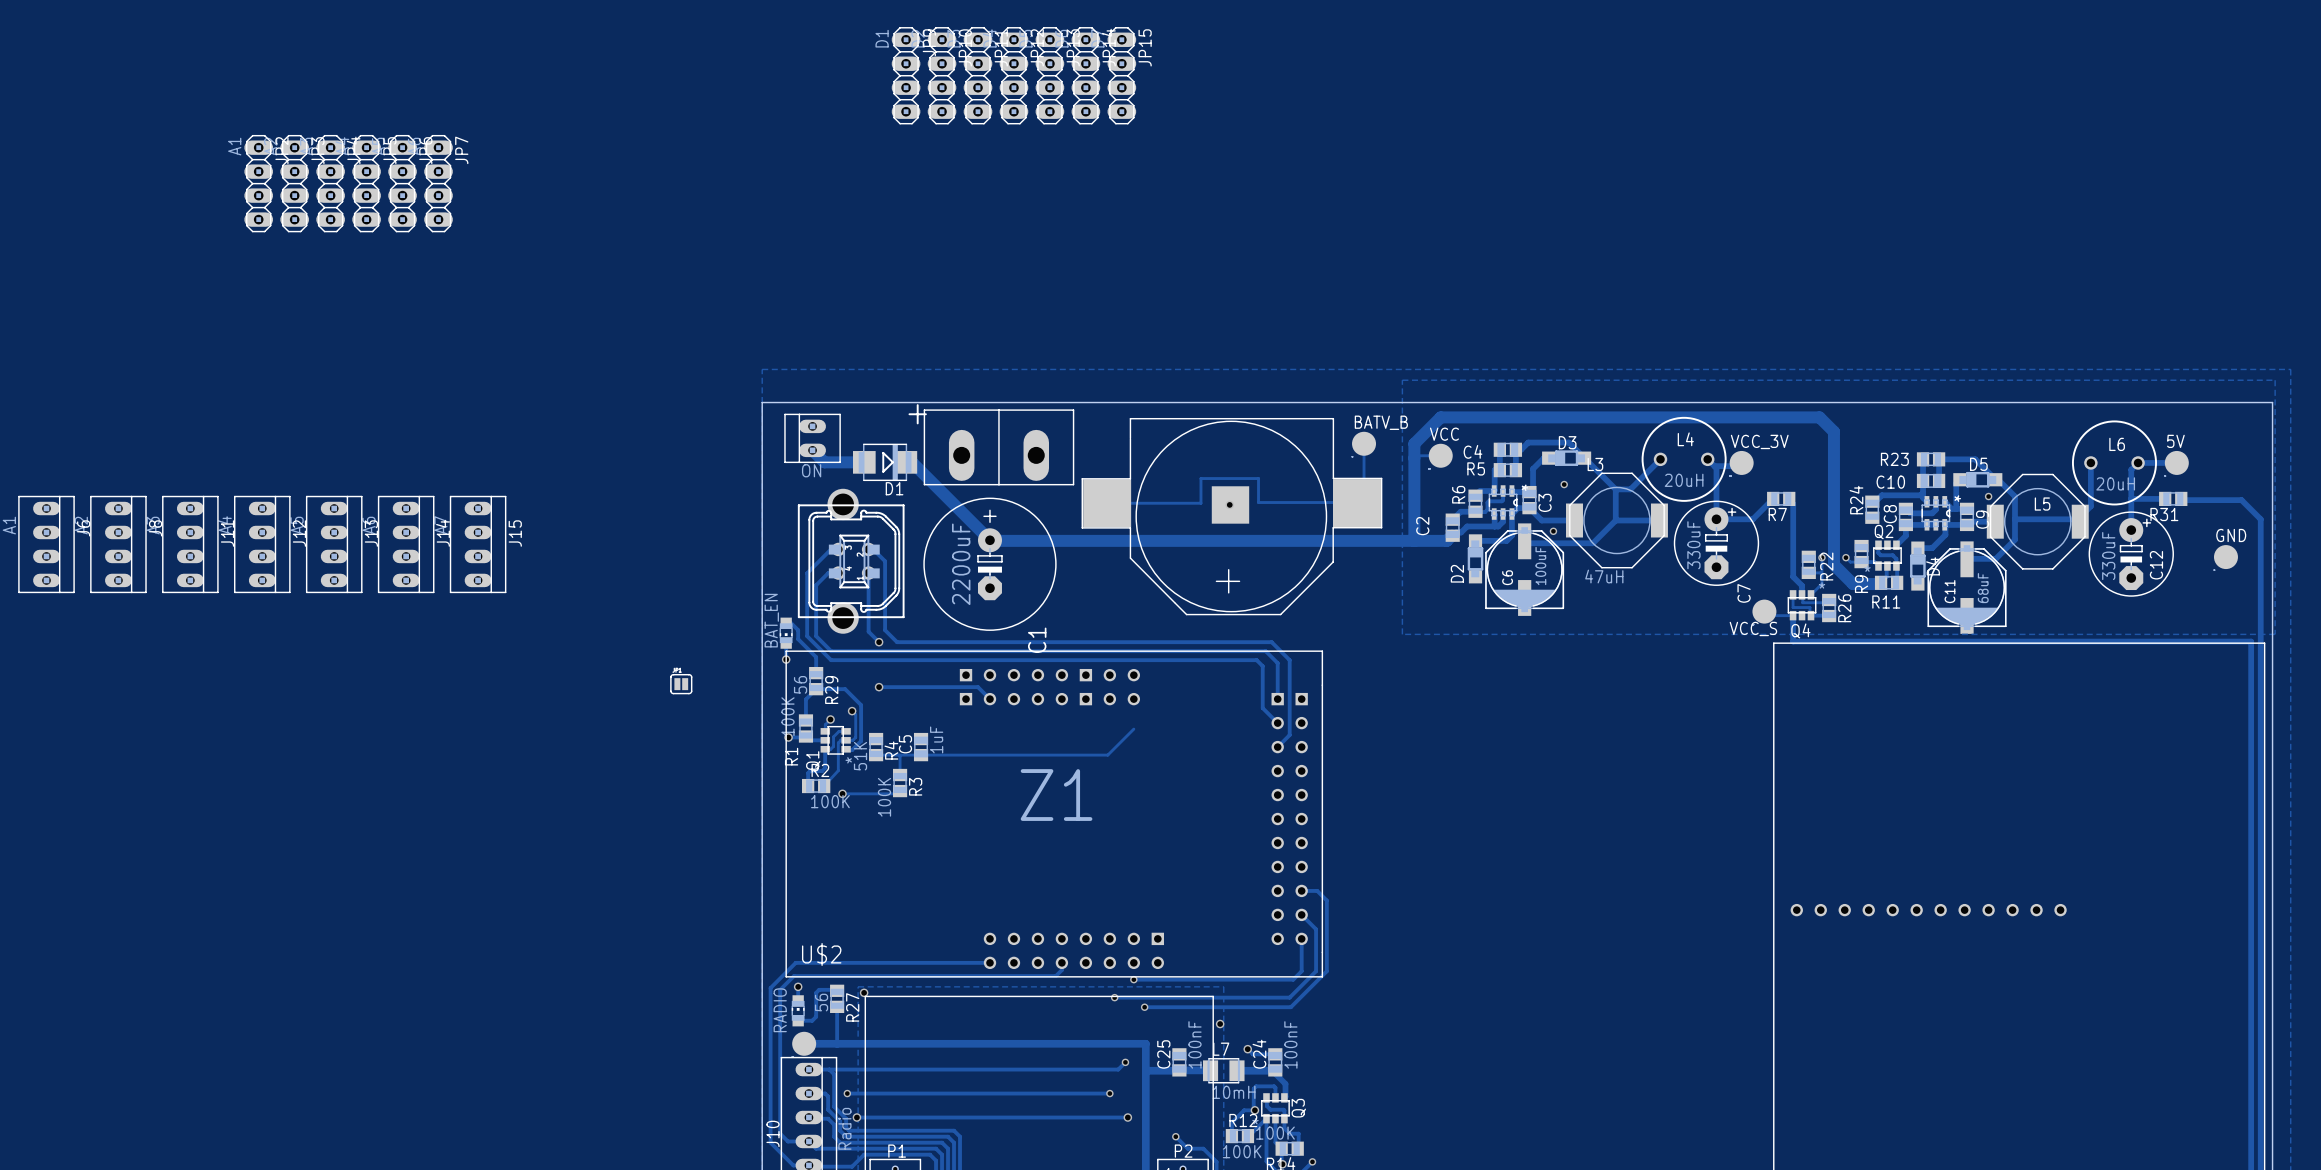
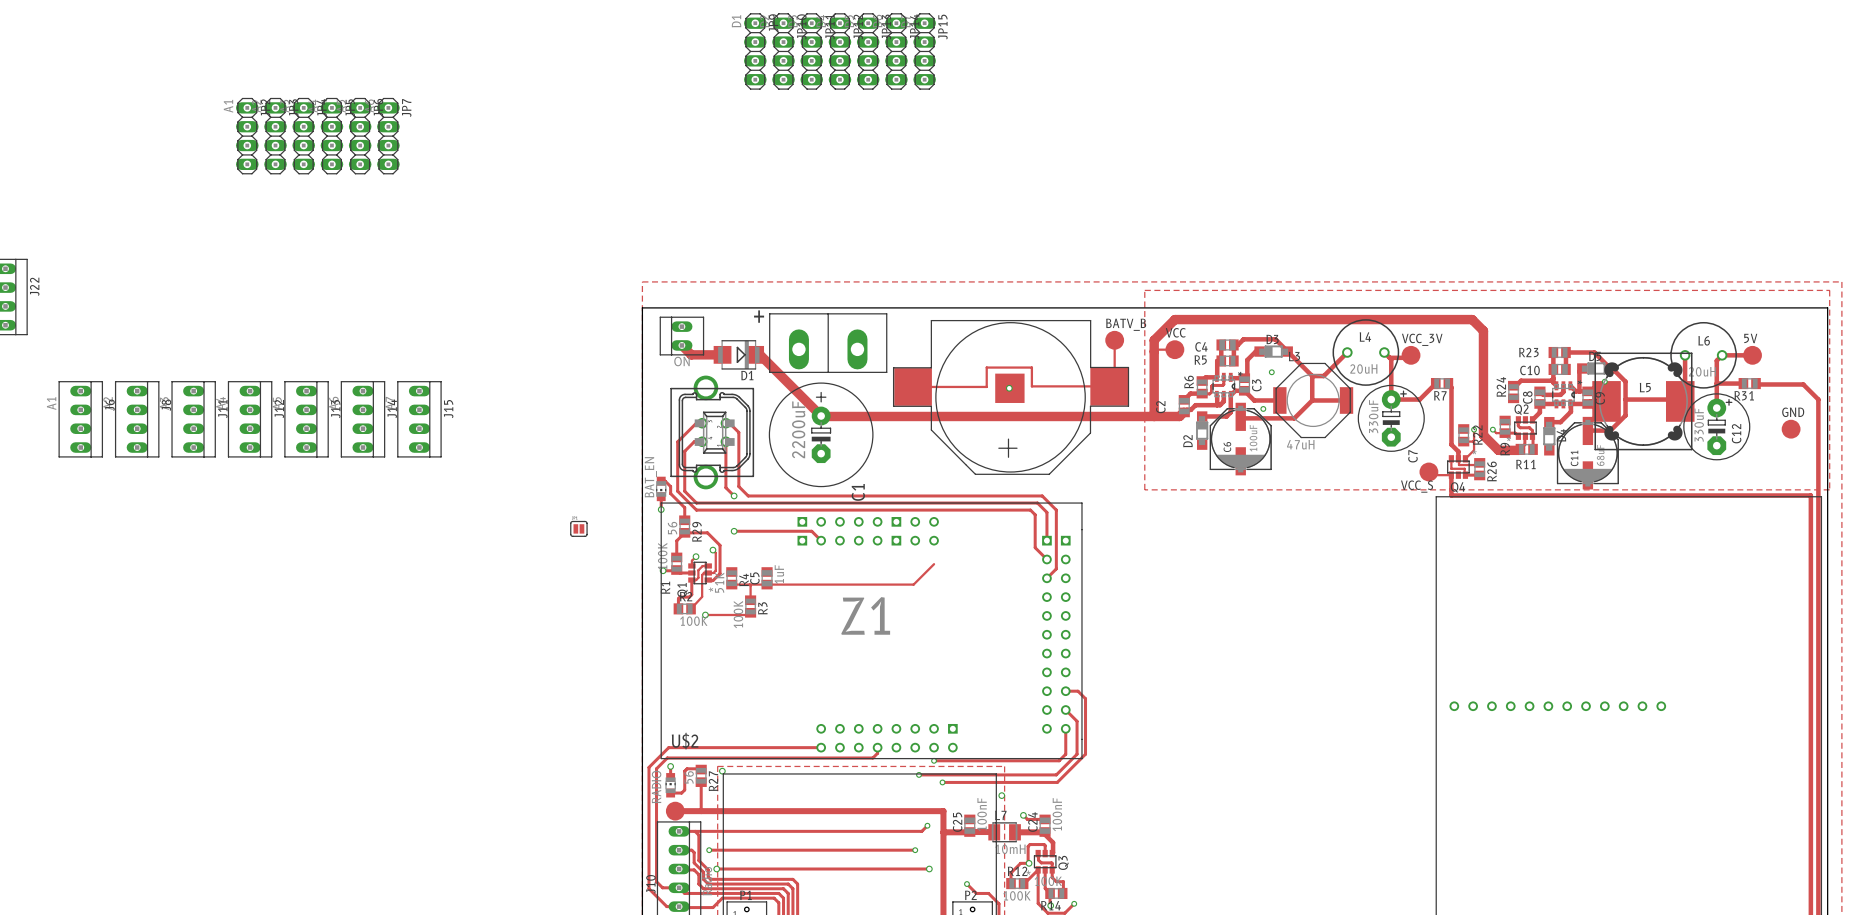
L5 footprint: [1986, 473, 2089, 570] -> [1592, 352, 1695, 451]

